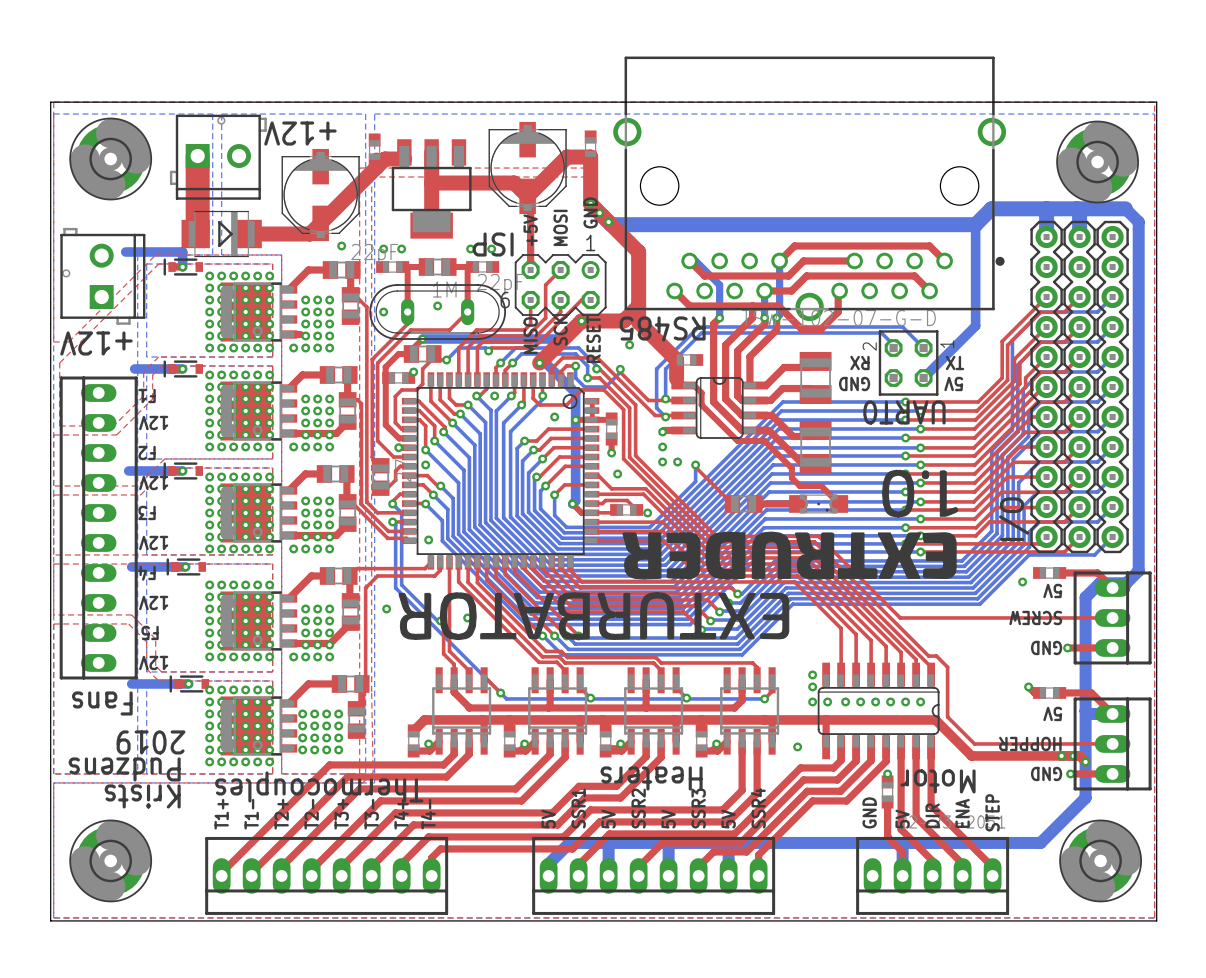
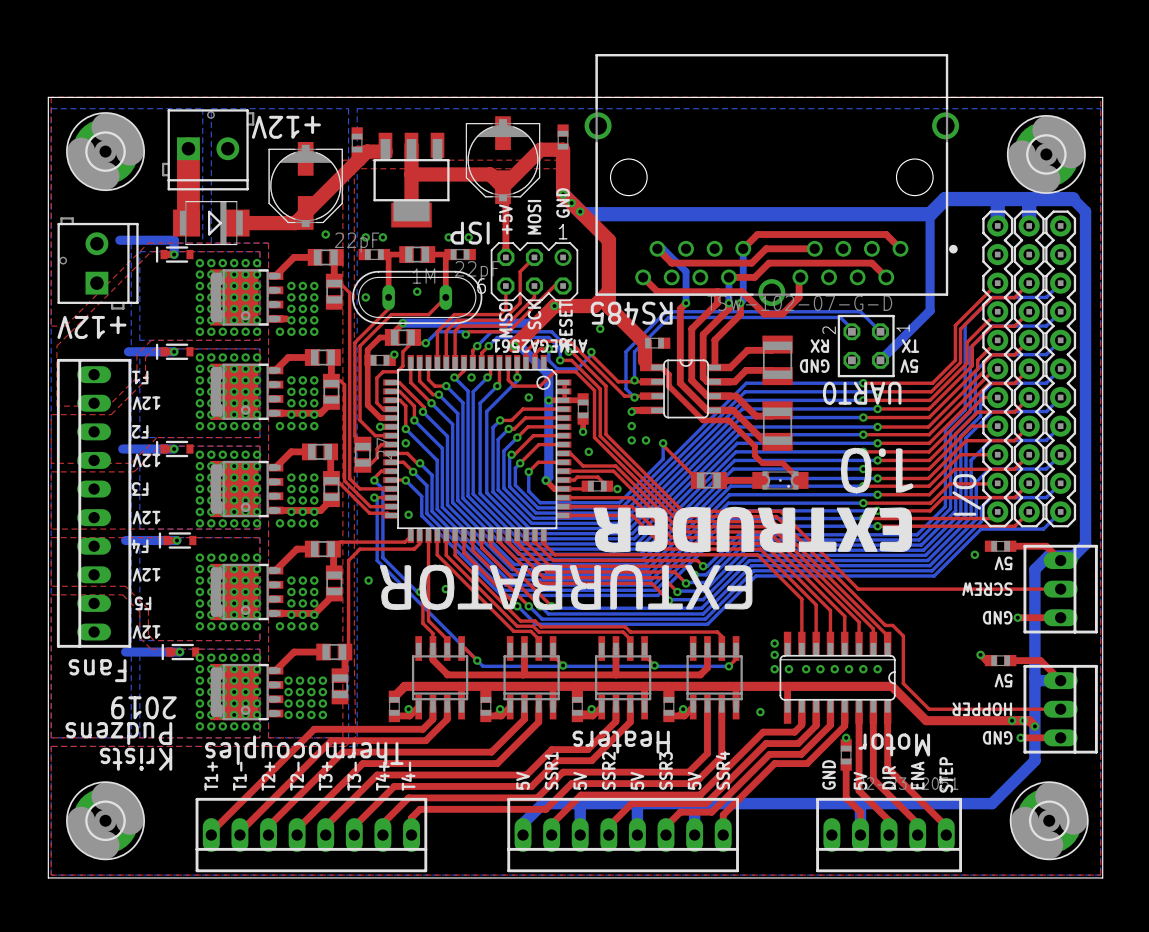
text: none -> ATMEGA2561 (539, 346)

